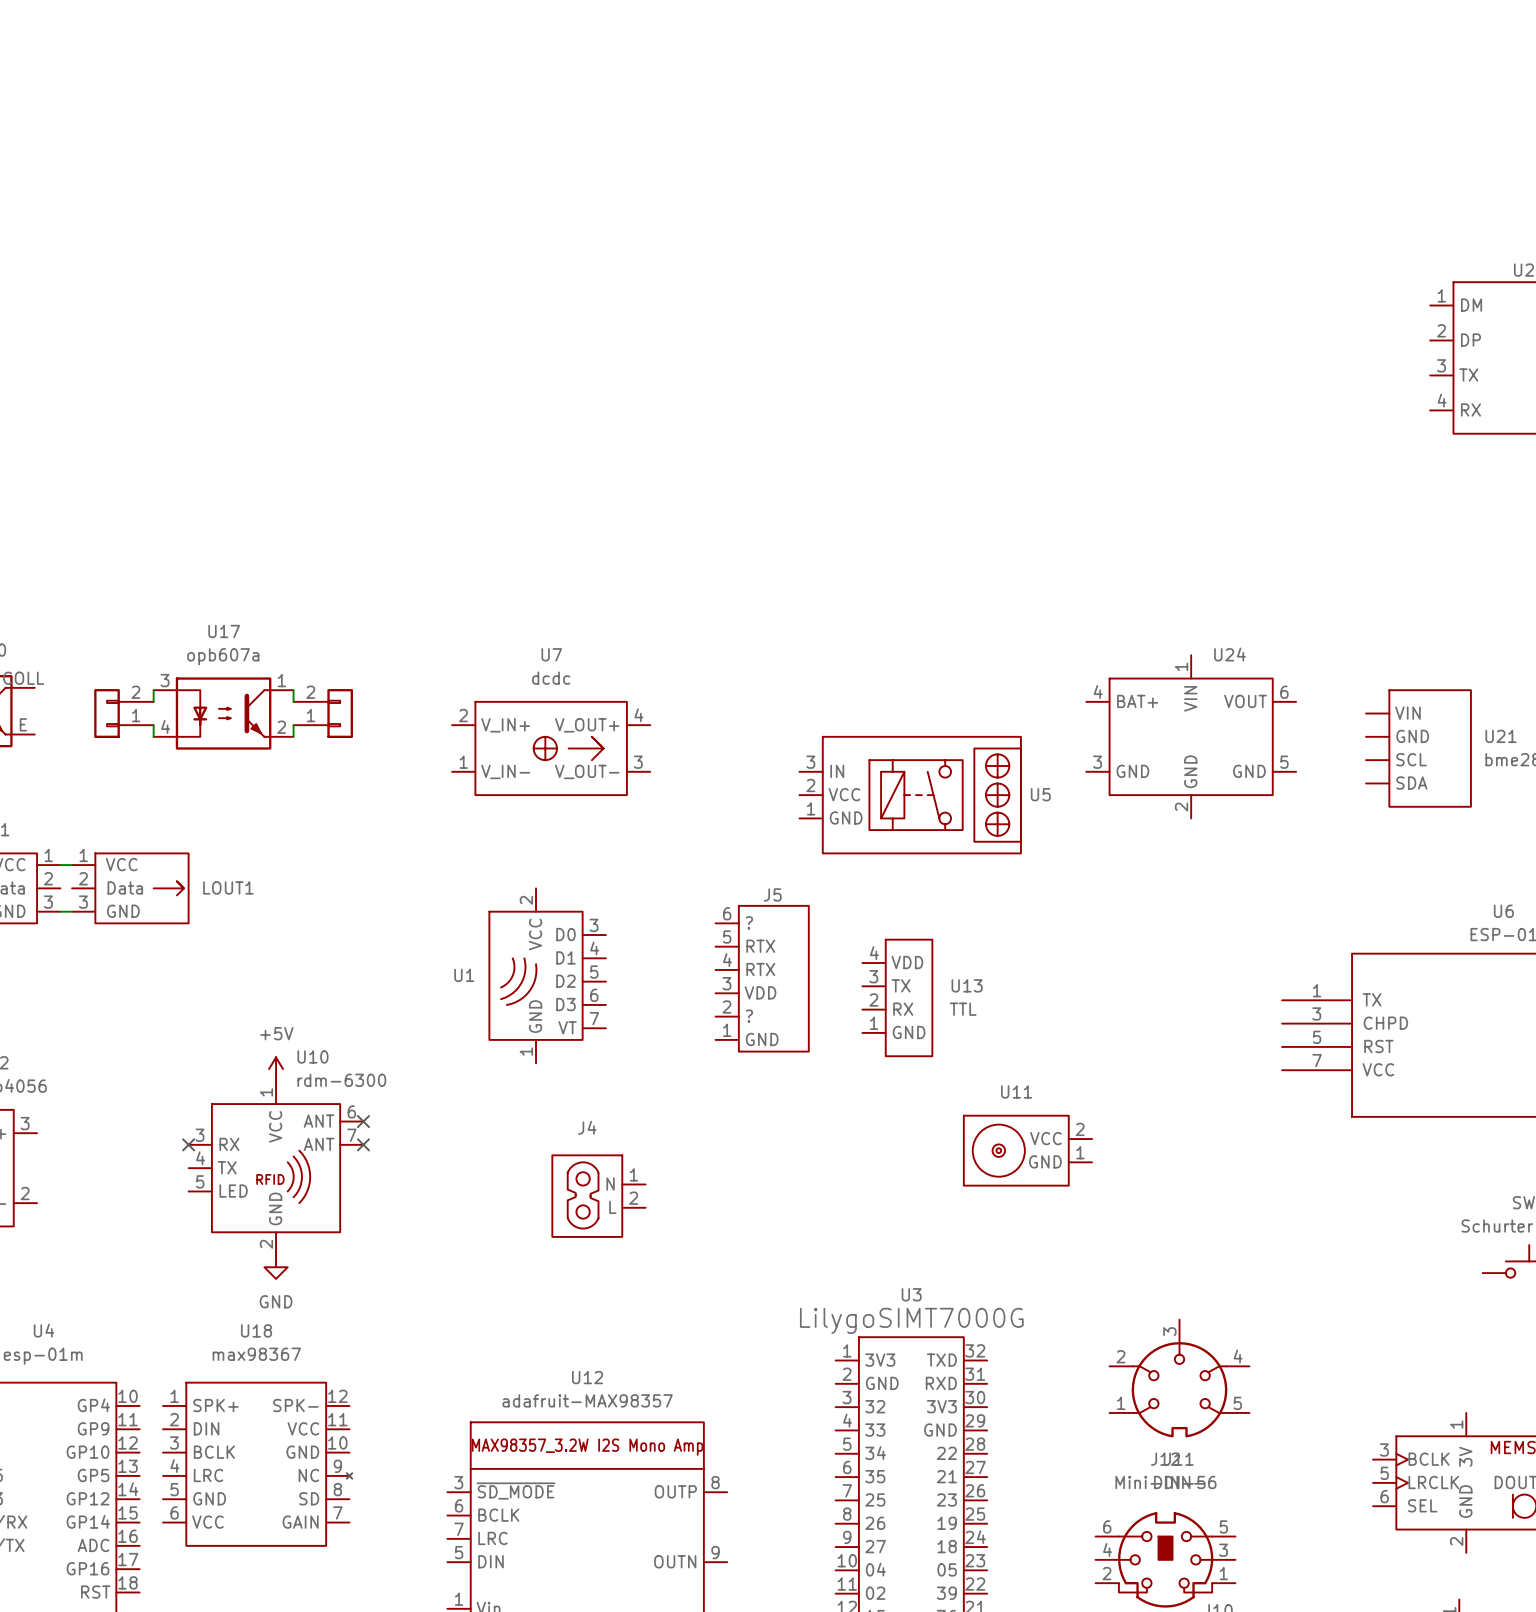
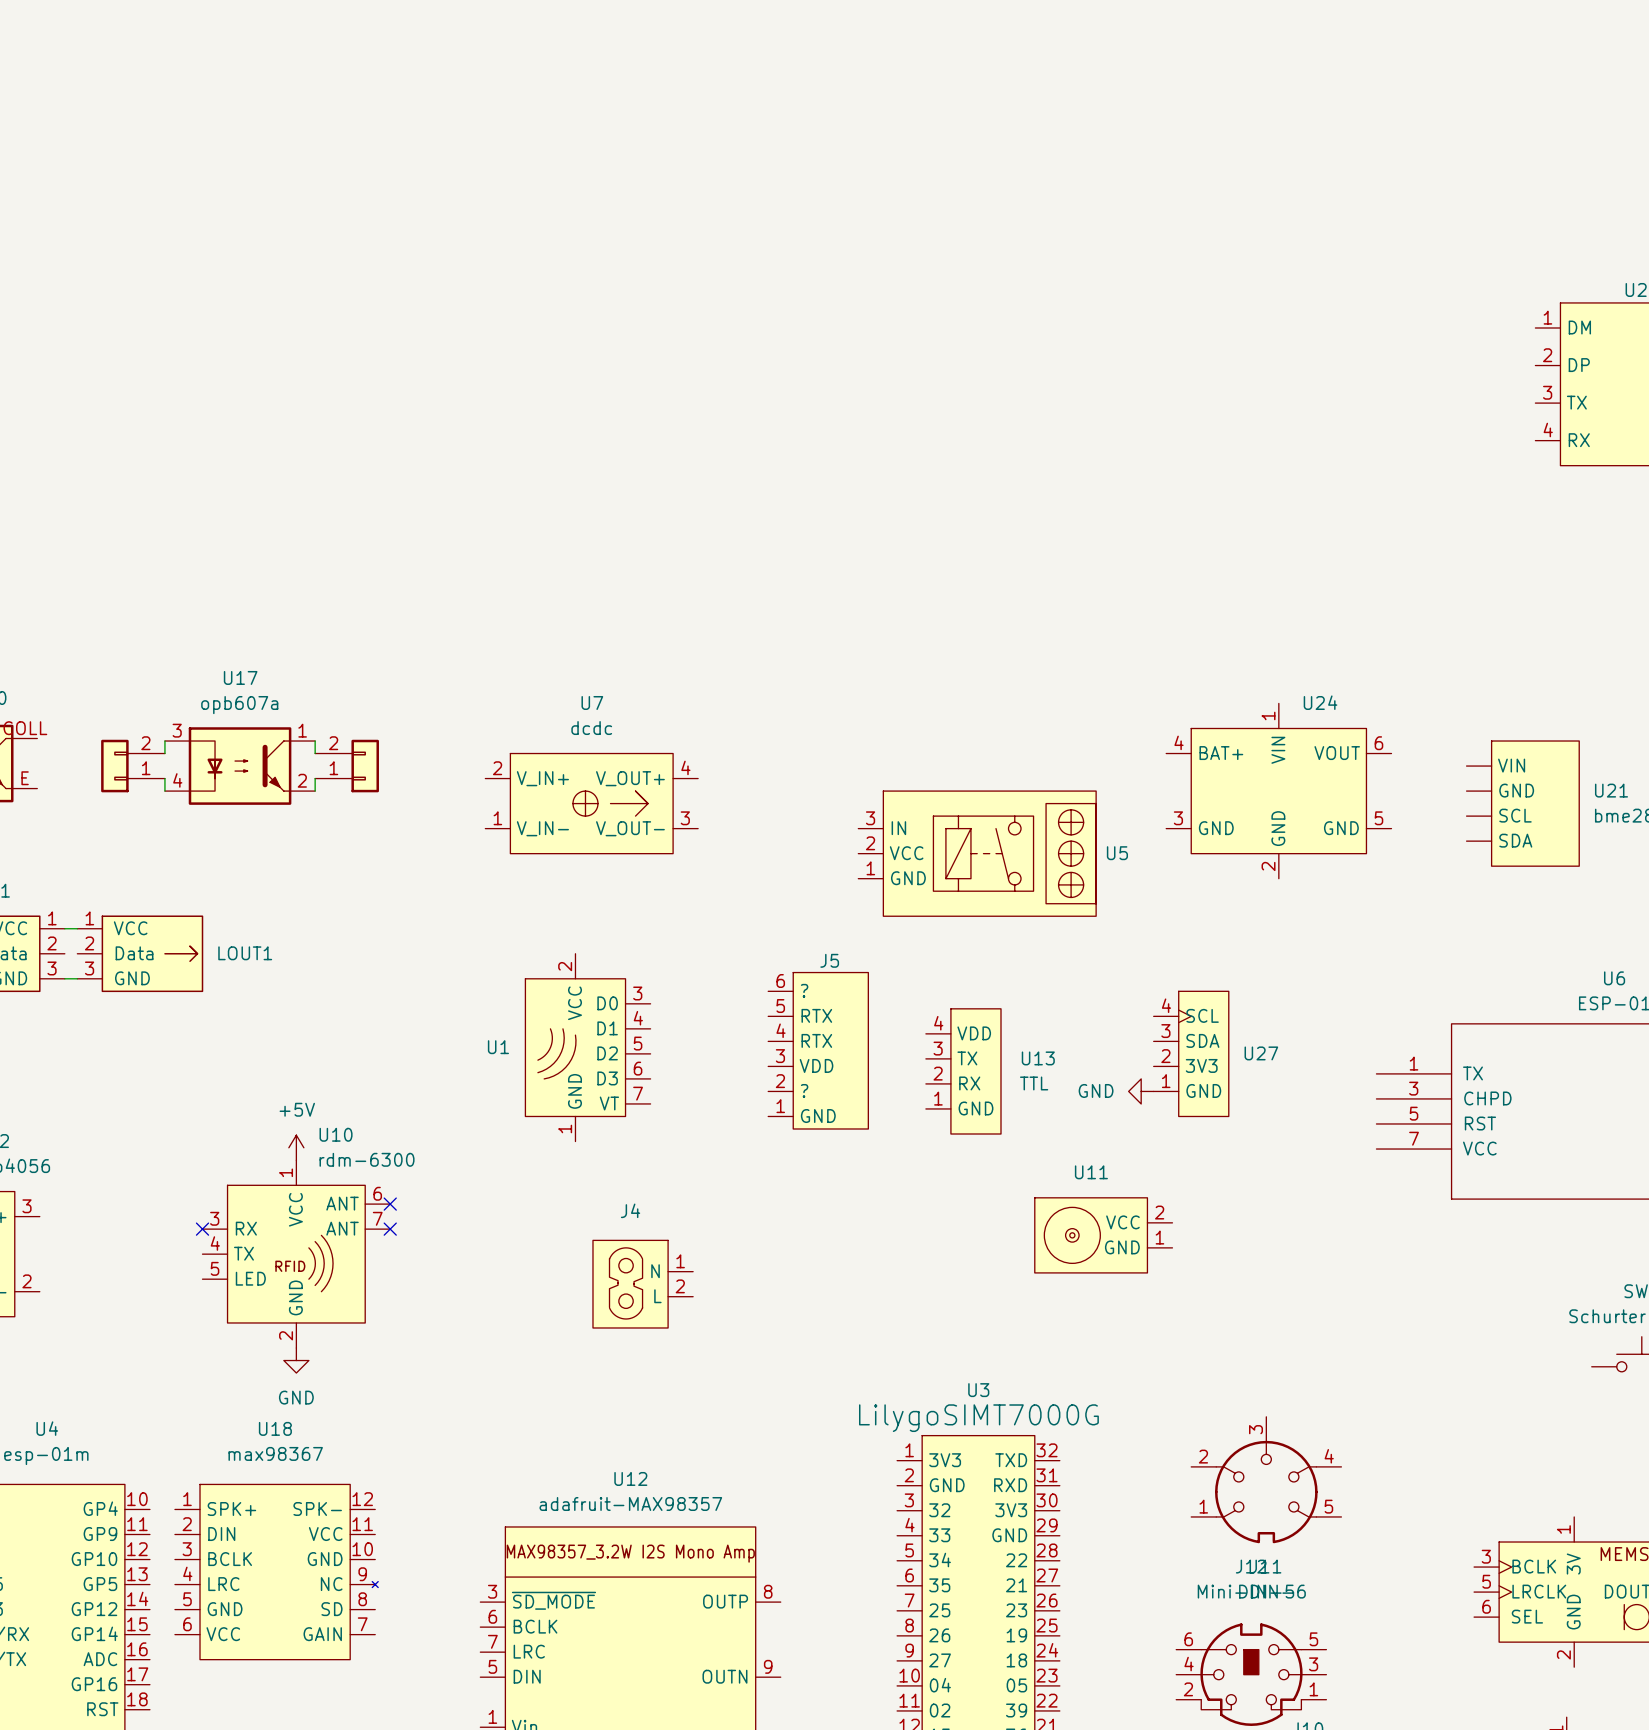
U27: none -> (1191, 1053)
power symbol: none -> GND (1141, 1091)

